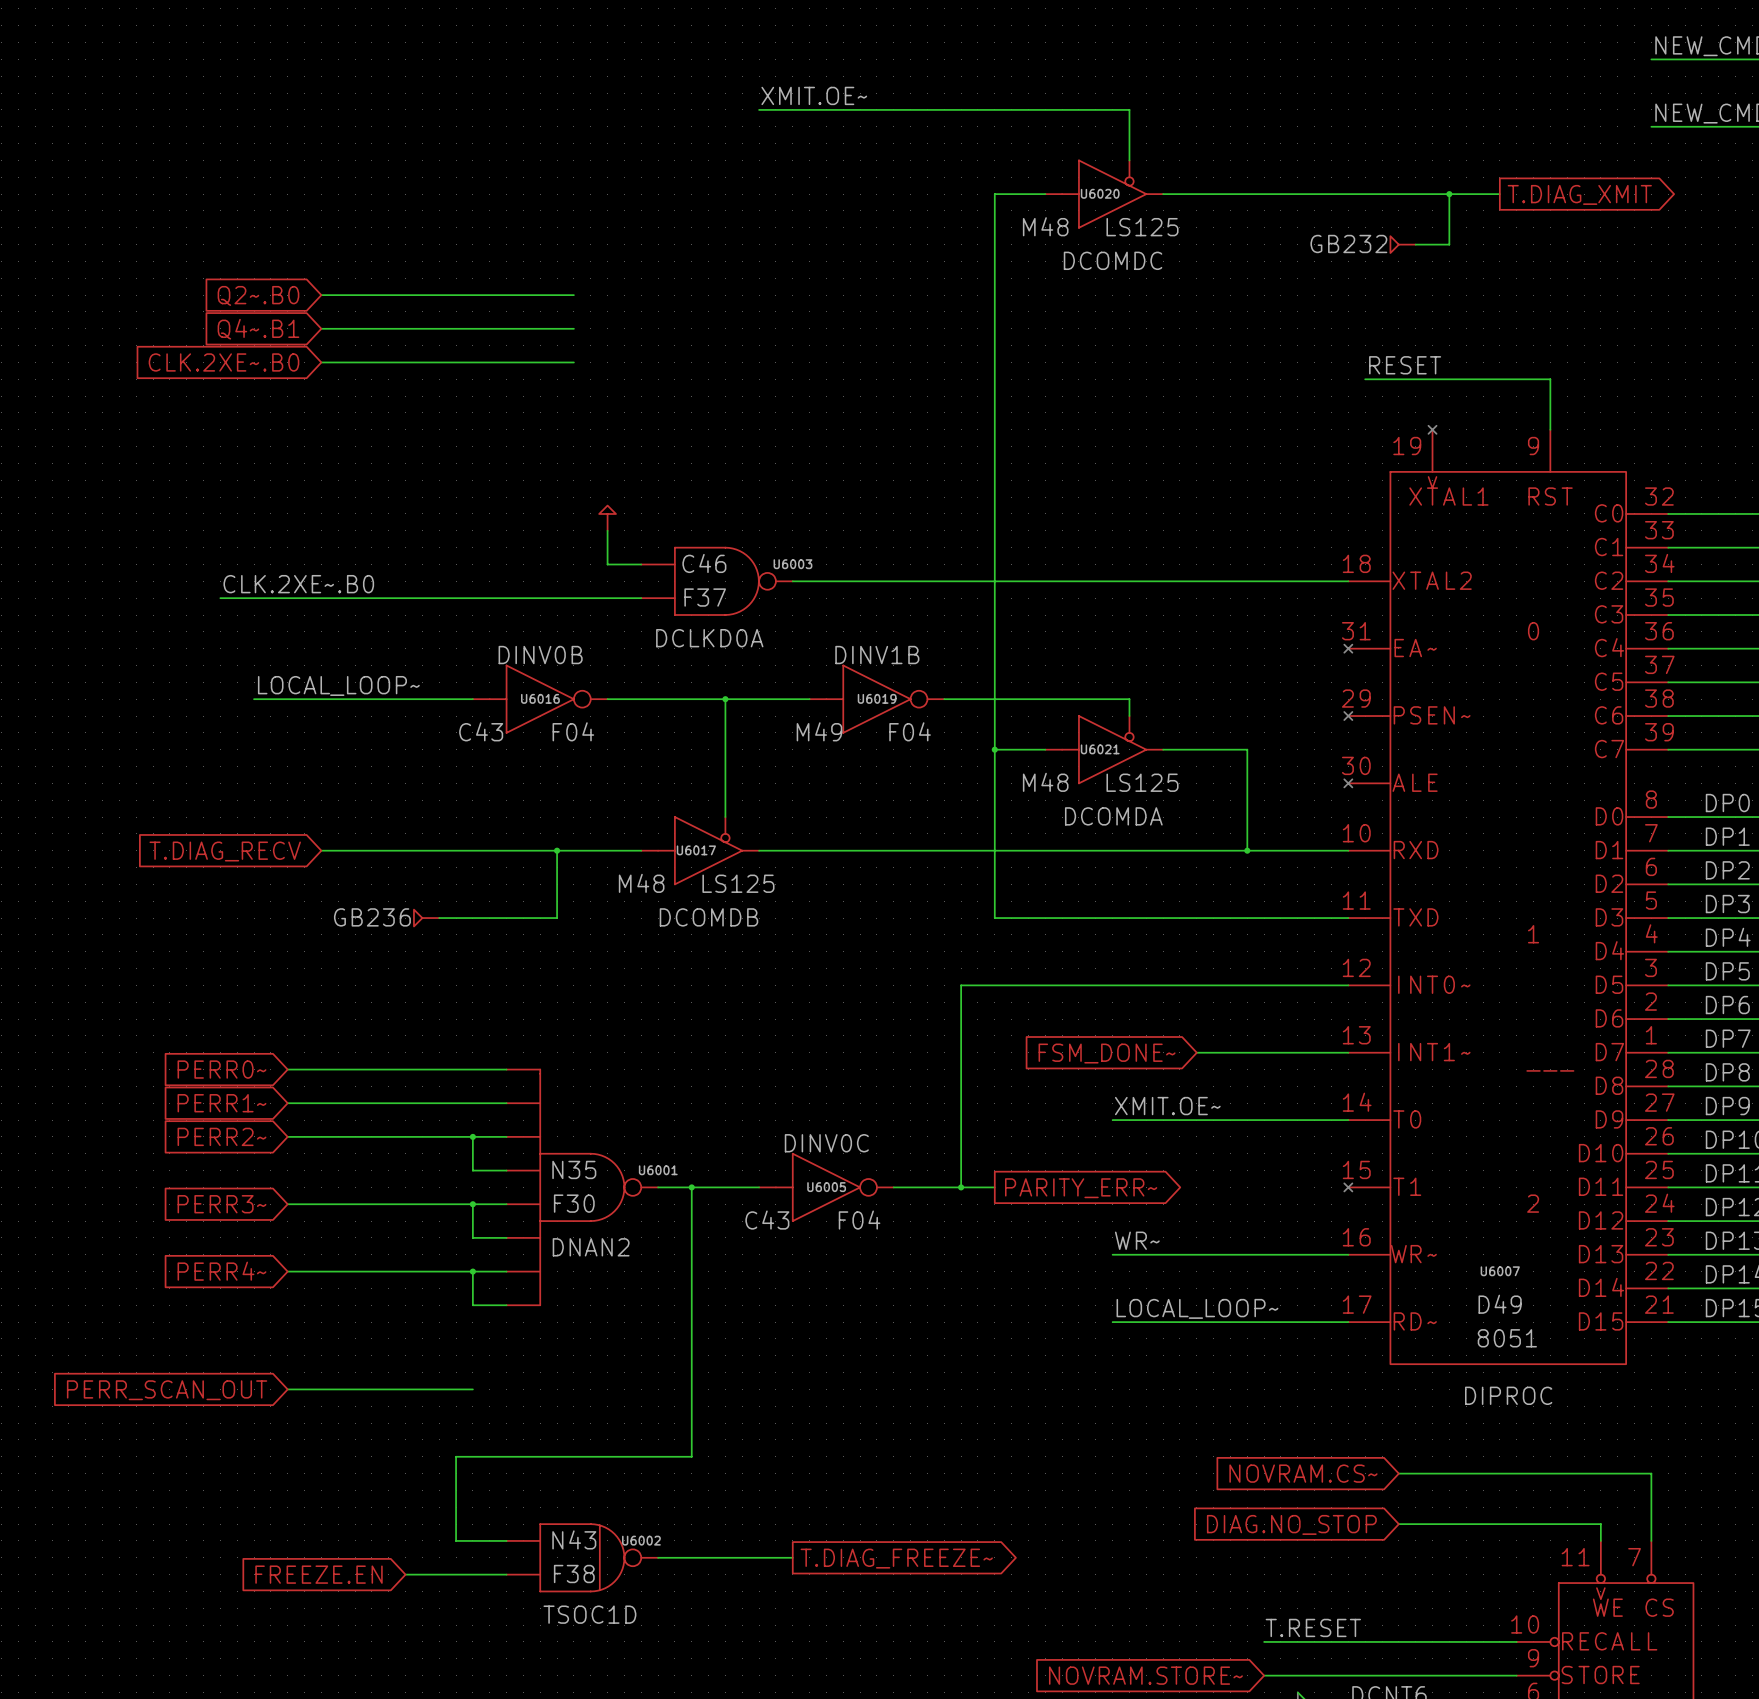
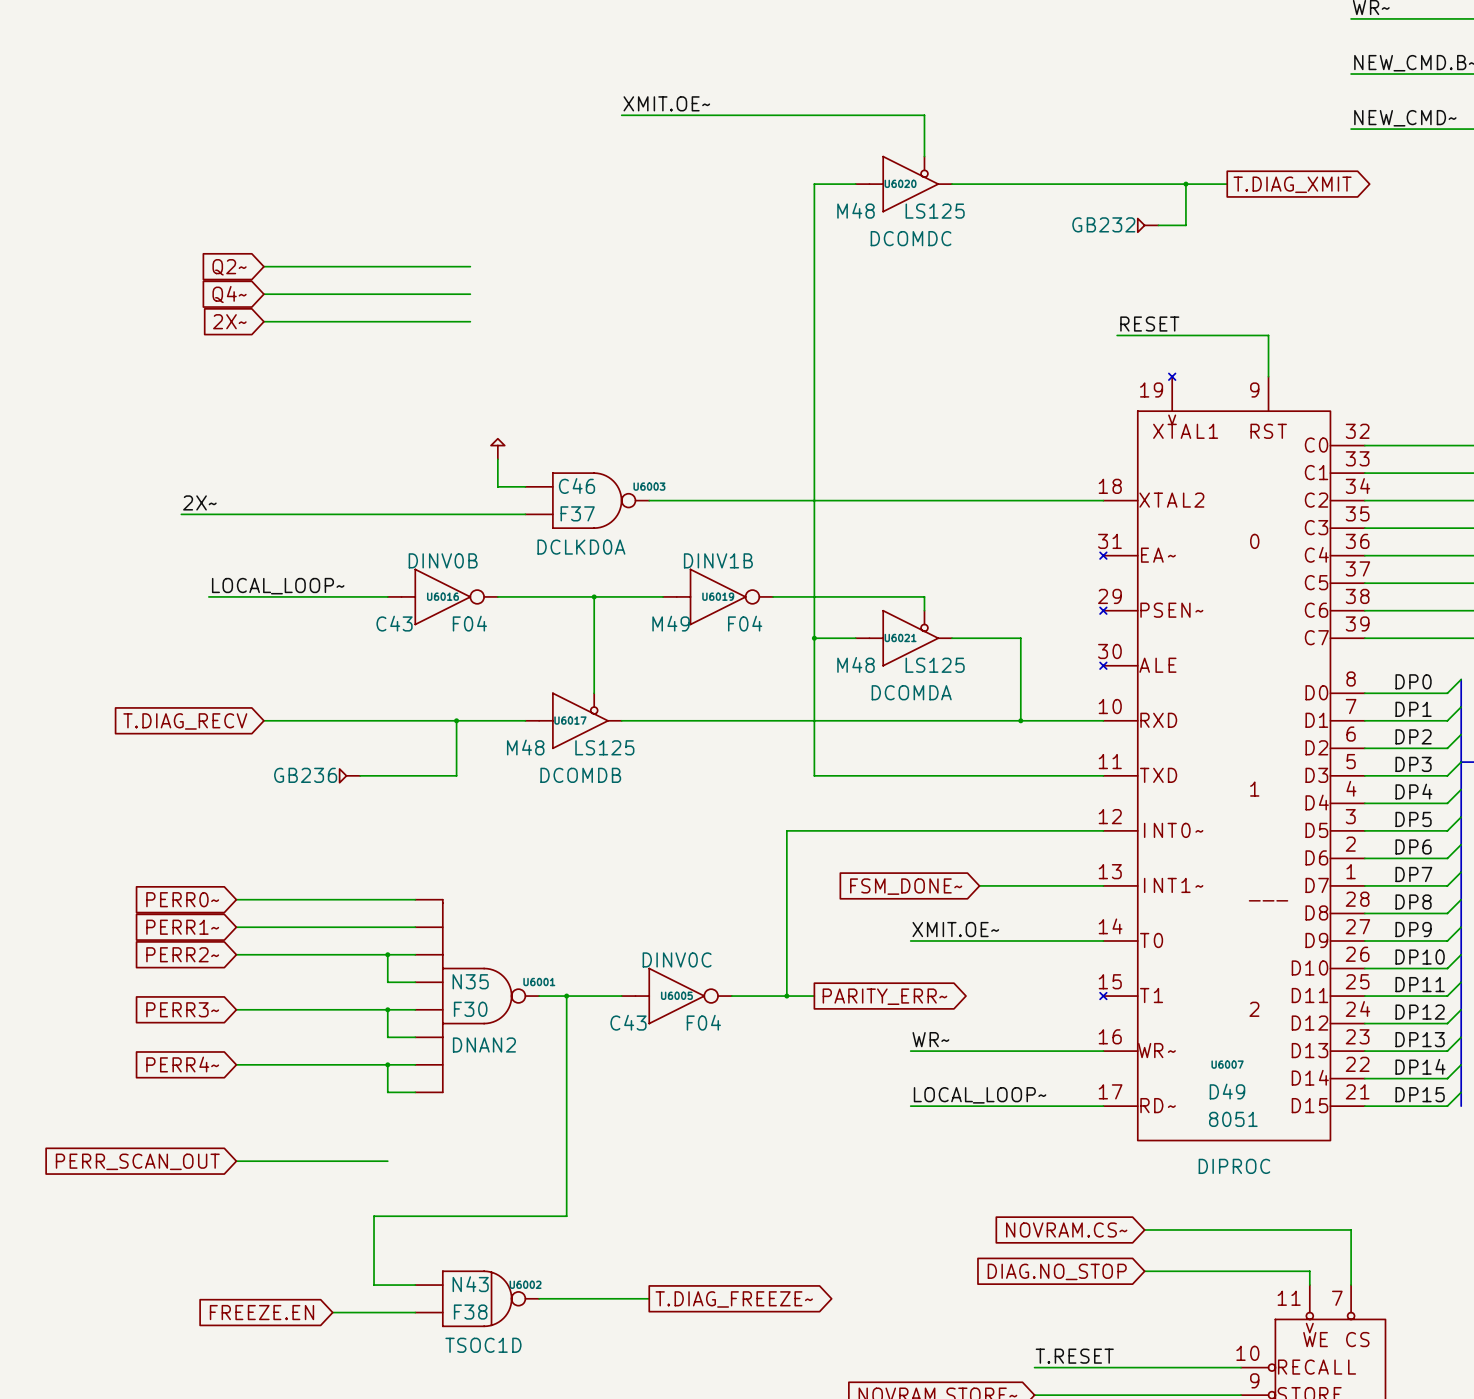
global label: Q2~.B0 (258, 295) -> Q2~ (229, 267)
global label: Q4~.B1 (258, 329) -> Q4~ (229, 294)
global label: CLK.2XE~.B0 (224, 362) -> 2X~ (229, 321)
label: CLK.2XE~.B0 (298, 584) -> 2X~ (199, 502)

